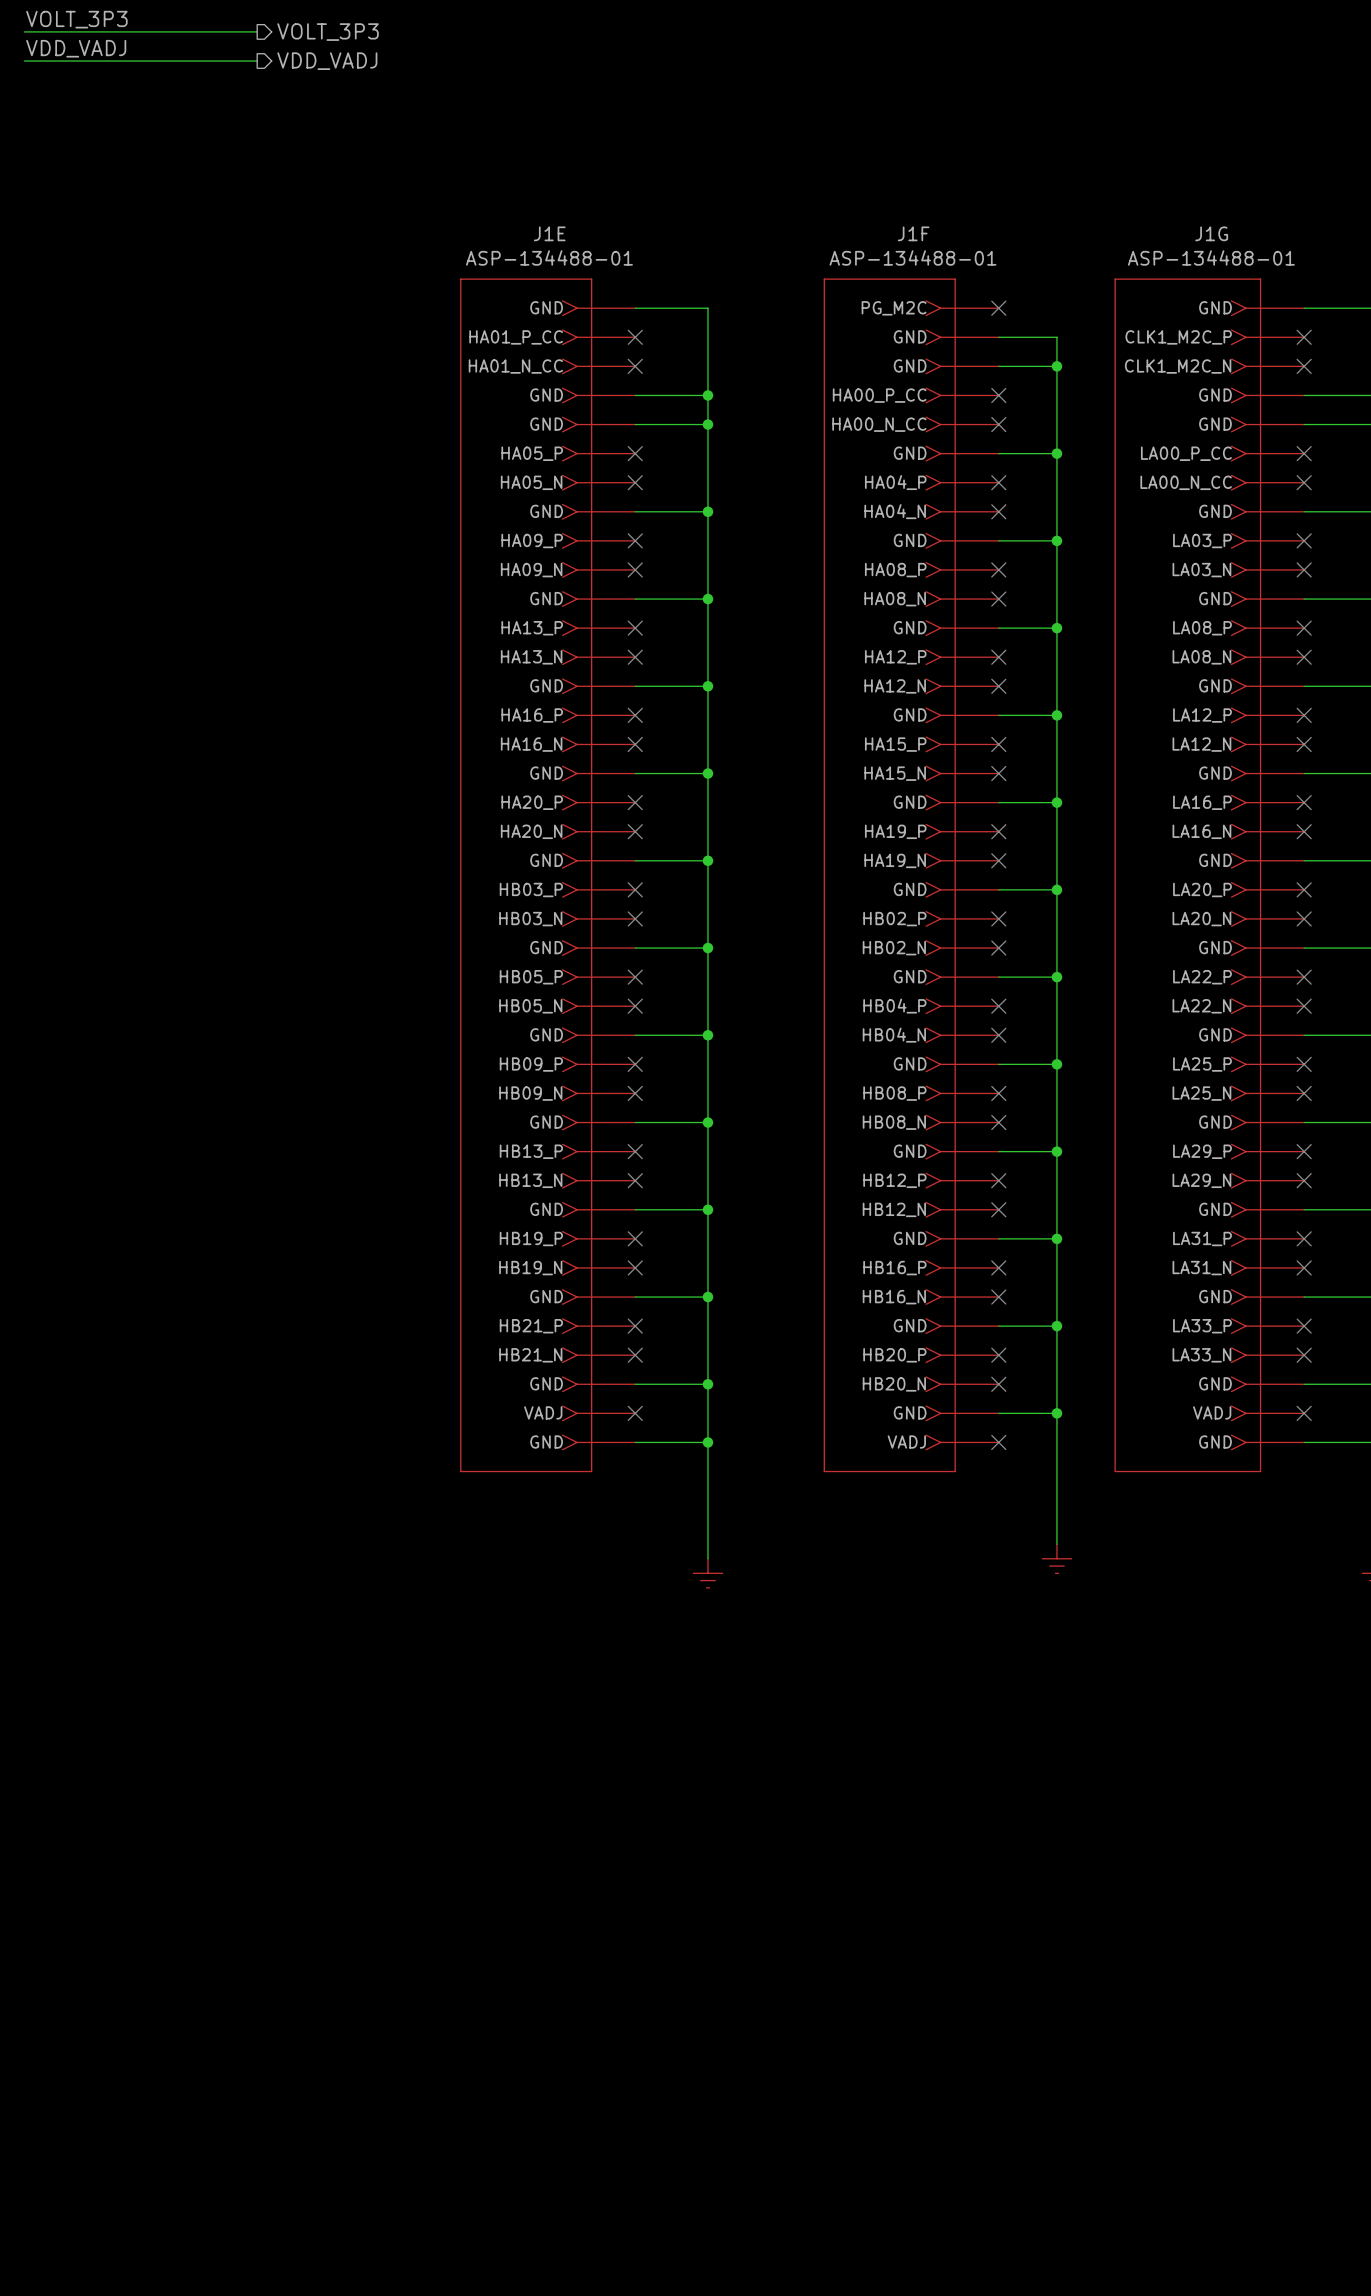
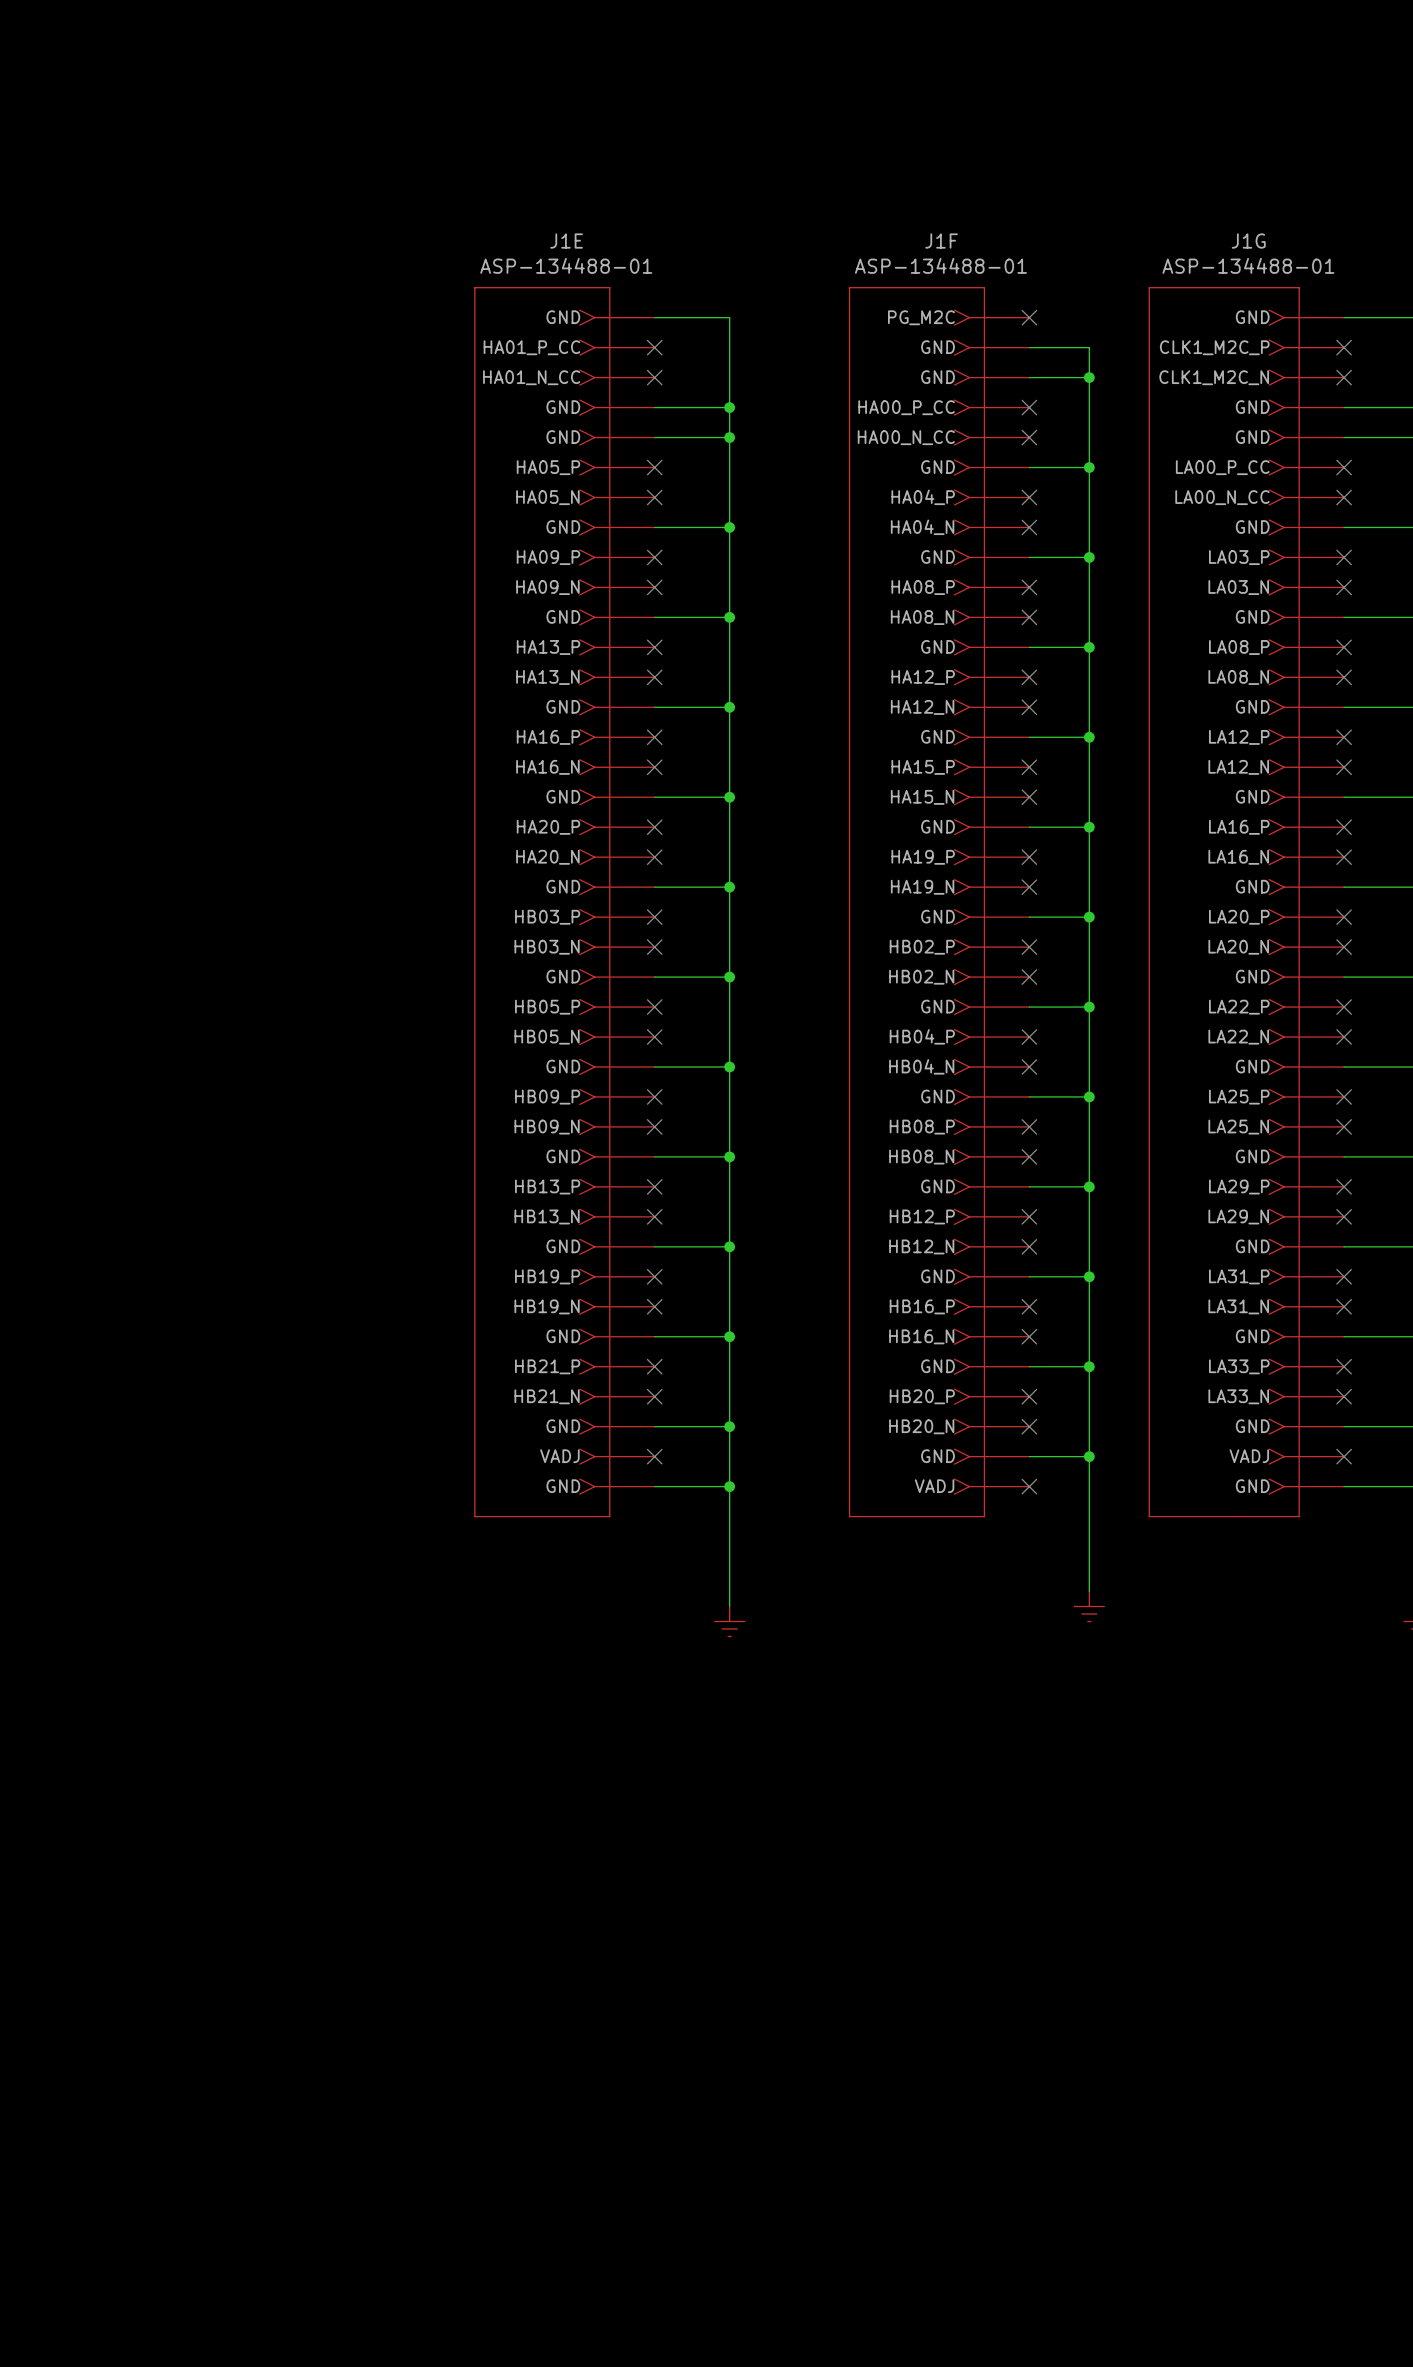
label: VOLT_3P3 (76, 19) -> none
wire: (24, 31) (257, 31) -> none
hierarchical label: VOLT_3P3 (328, 32) -> none
label: VDD_VADJ (76, 48) -> none
wire: (24, 61) (257, 61) -> none
hierarchical label: VDD_VADJ (327, 61) -> none

